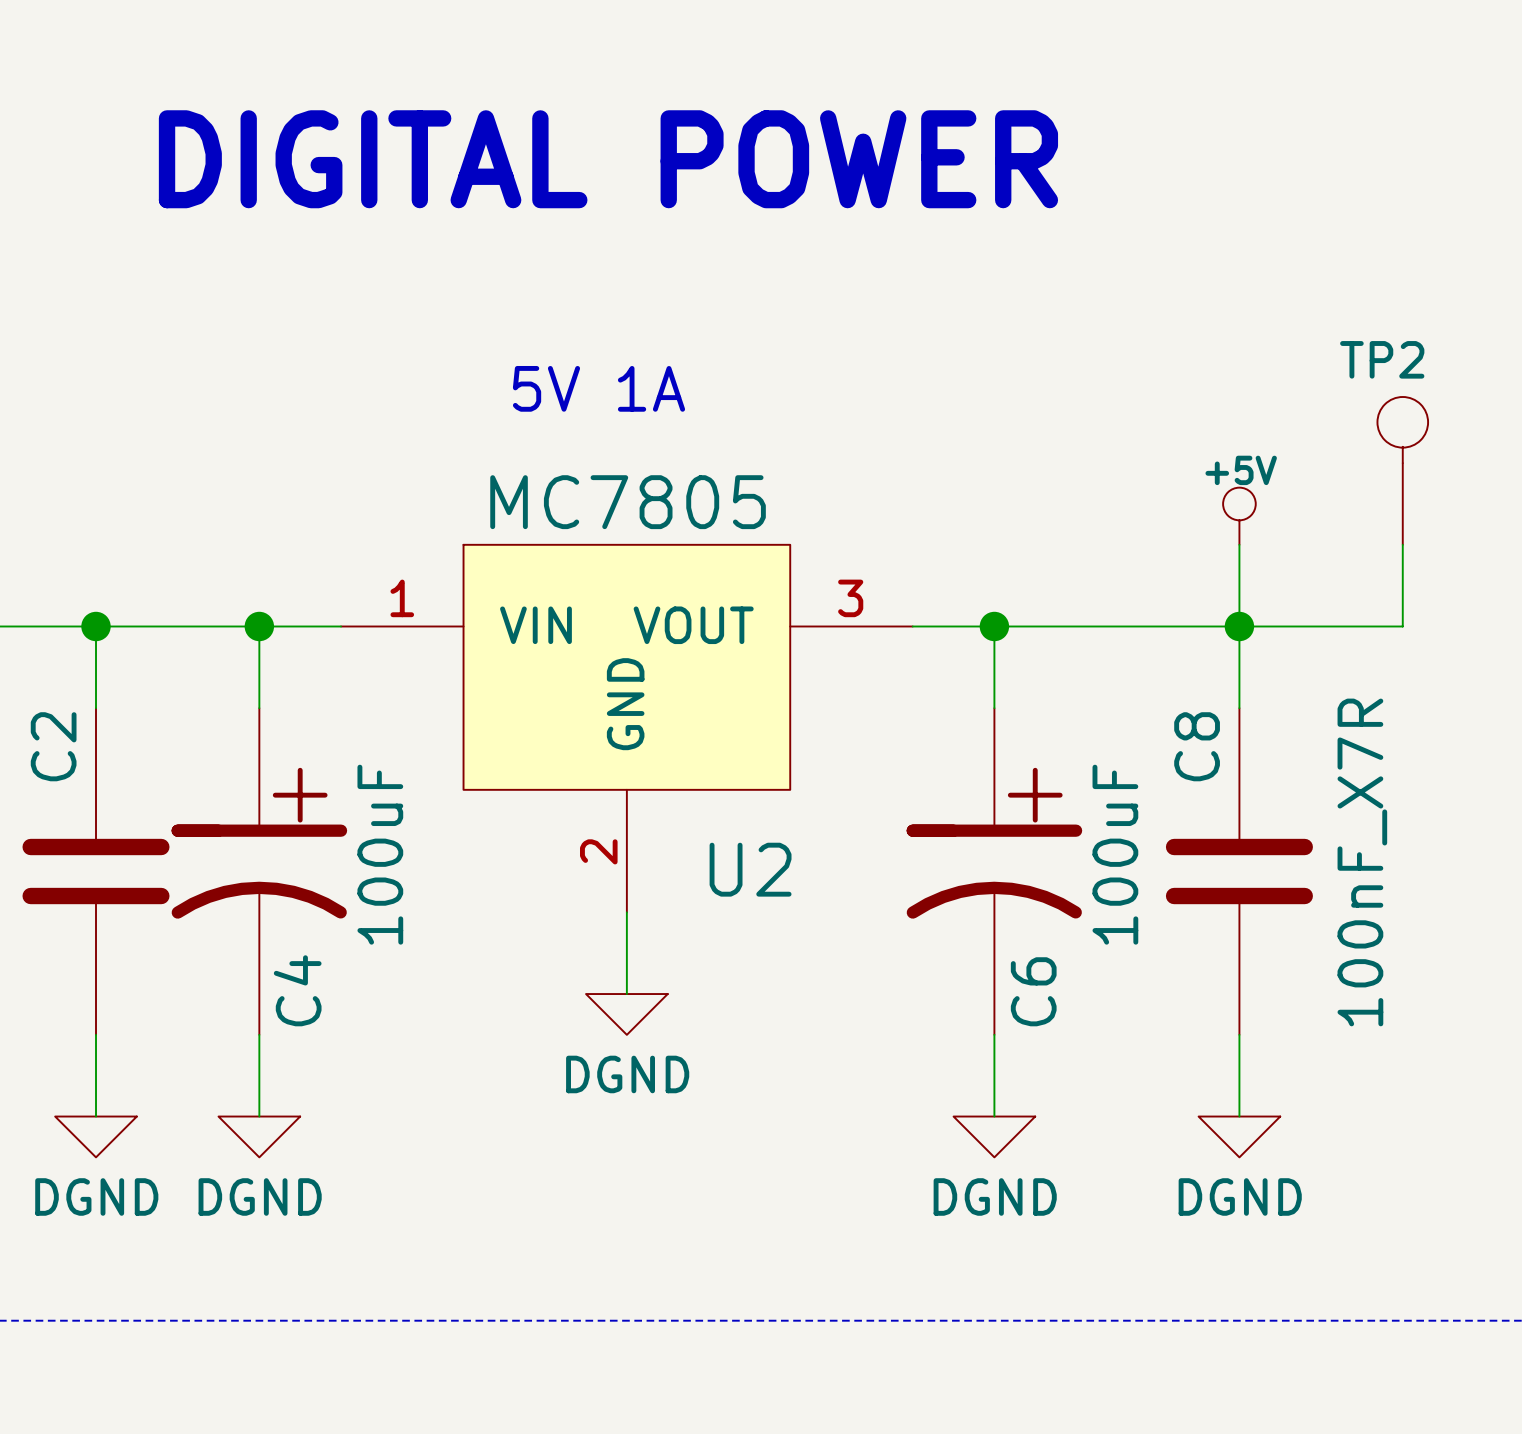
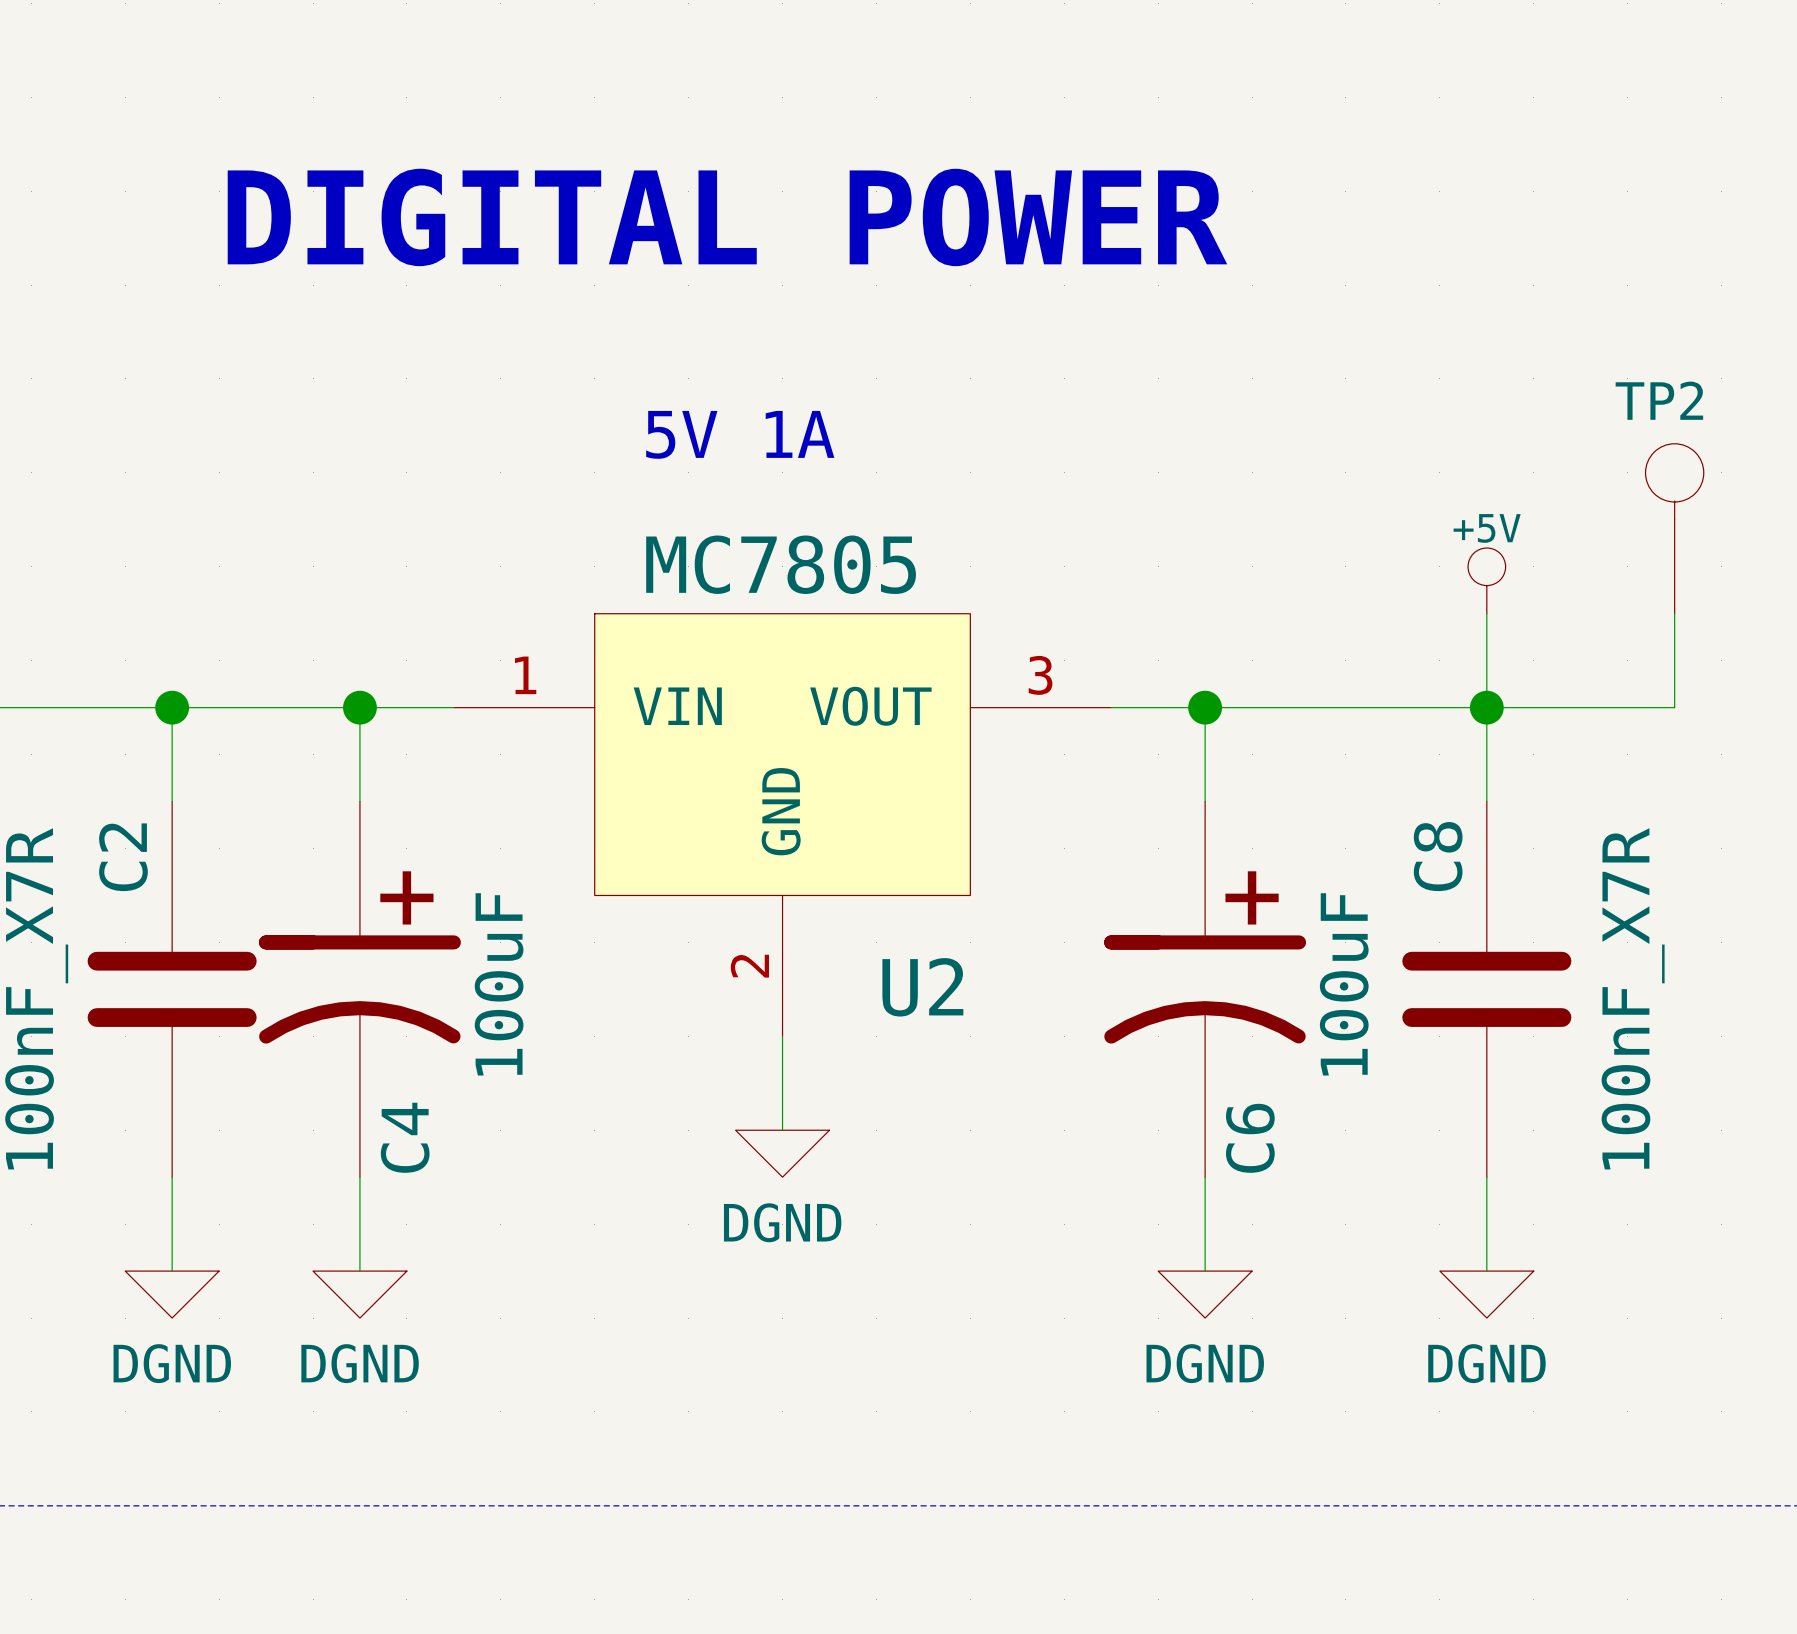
text position: DIGITAL POWER (608, 159) -> DIGITAL POWER (727, 217)

